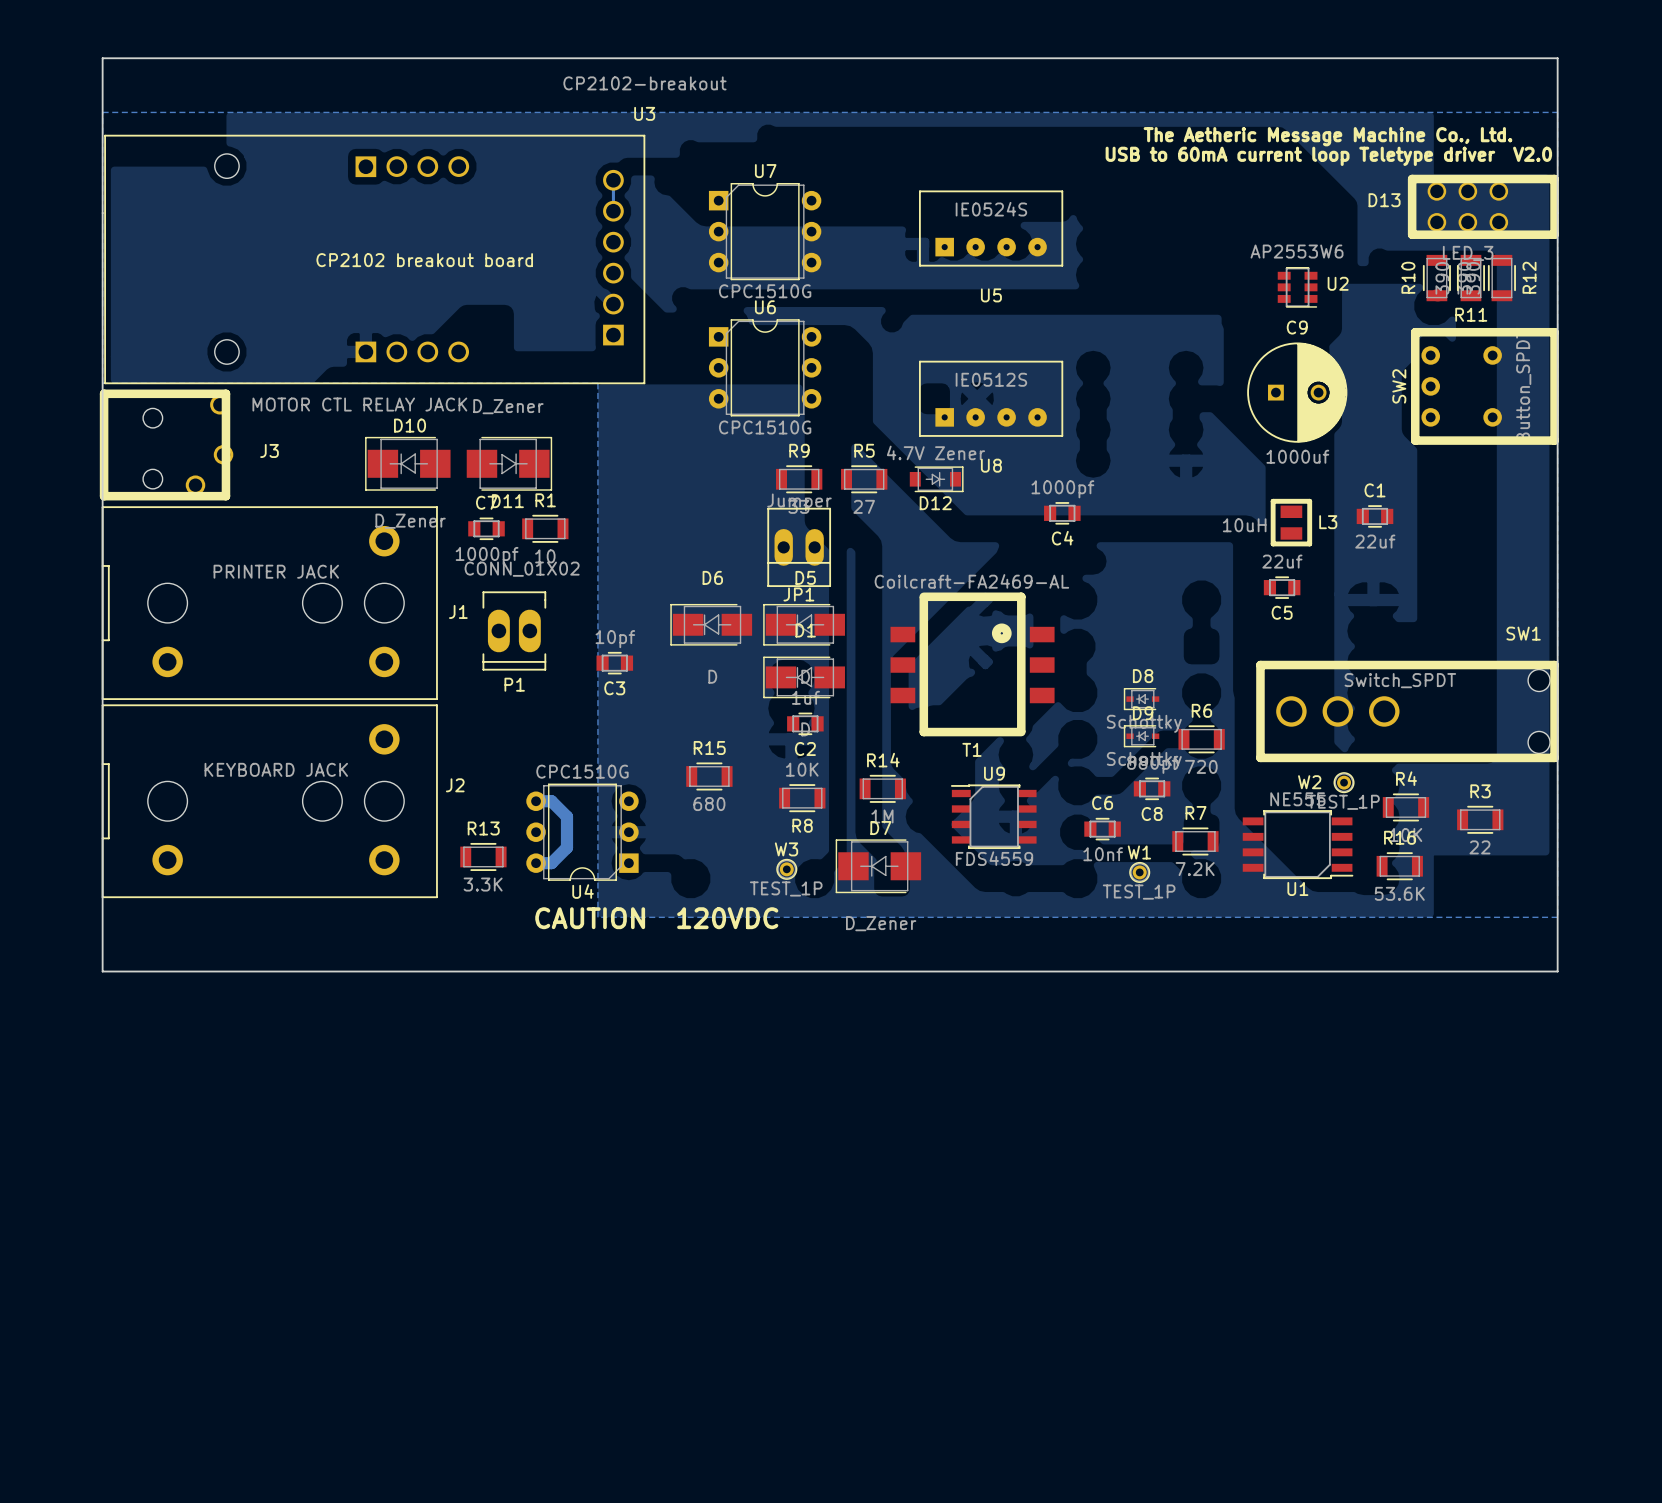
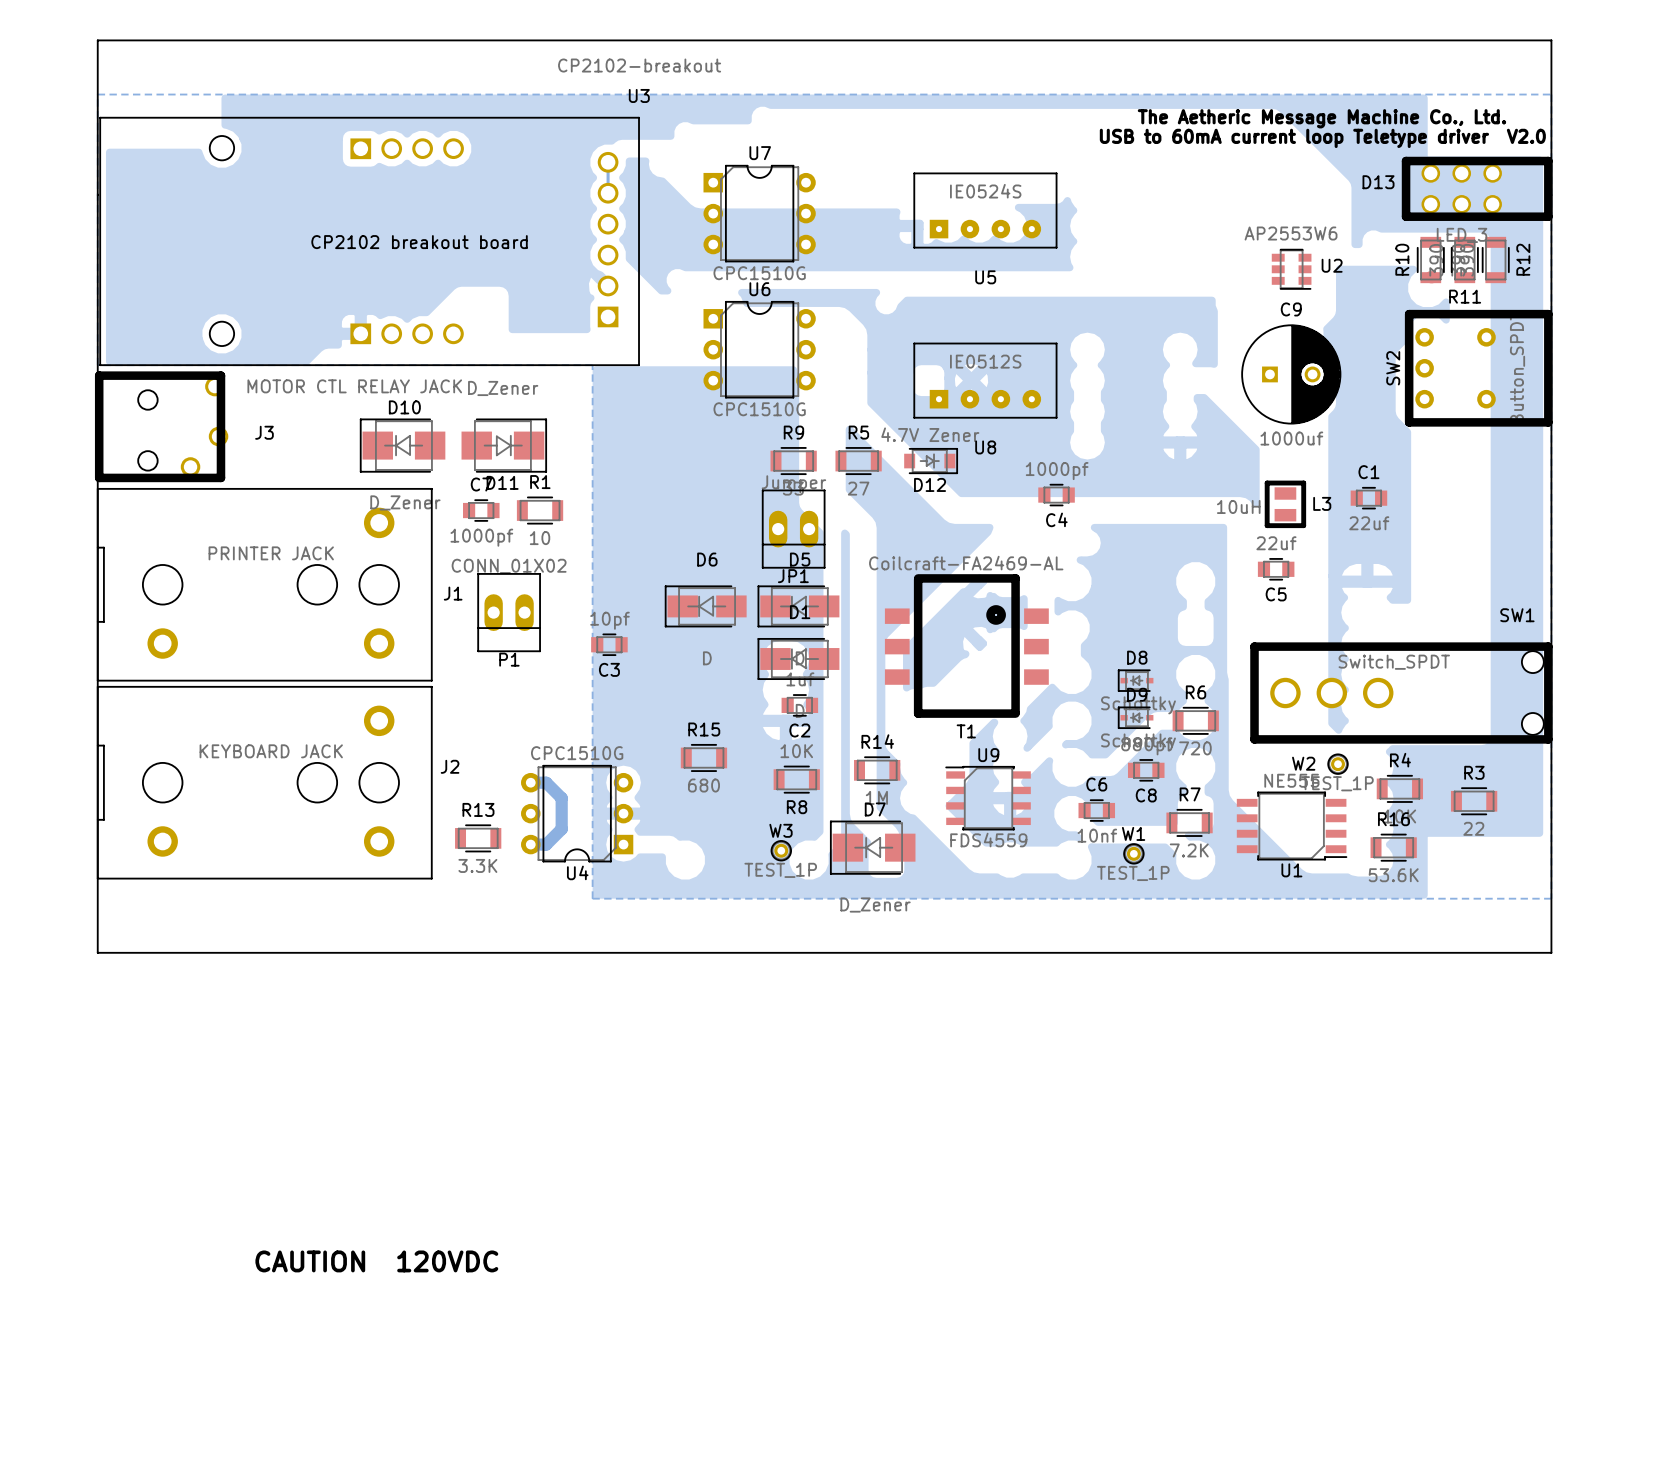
P1 footprint: [482, 591, 547, 671] -> [477, 573, 541, 653]
text: CAUTION 120VDC (656, 918) -> none
text: none -> CAUTION 120VDC (376, 1261)

